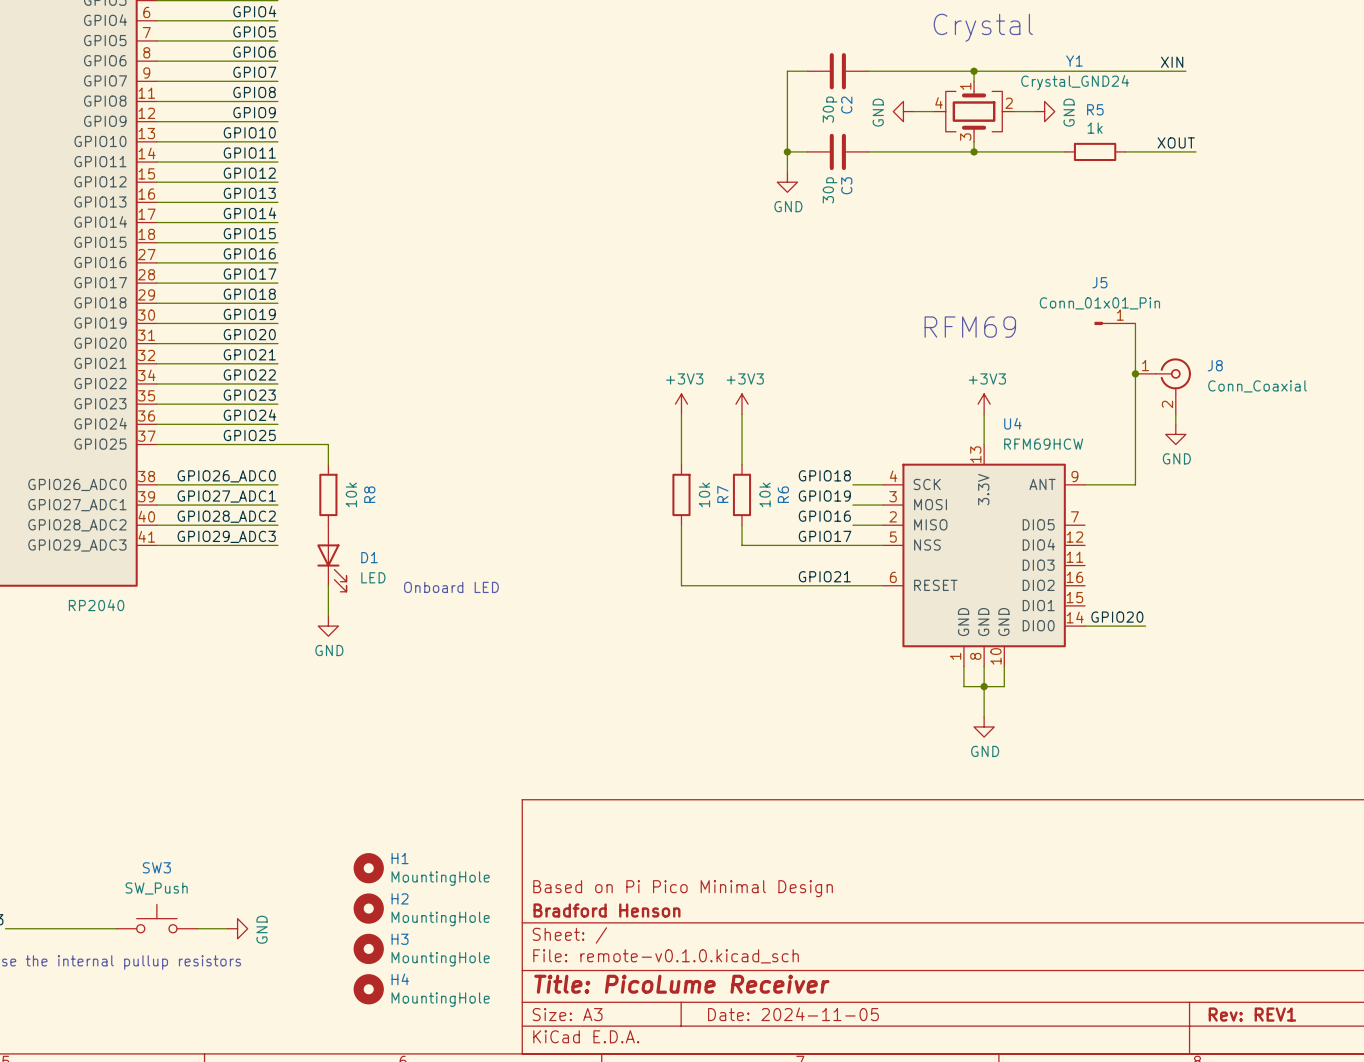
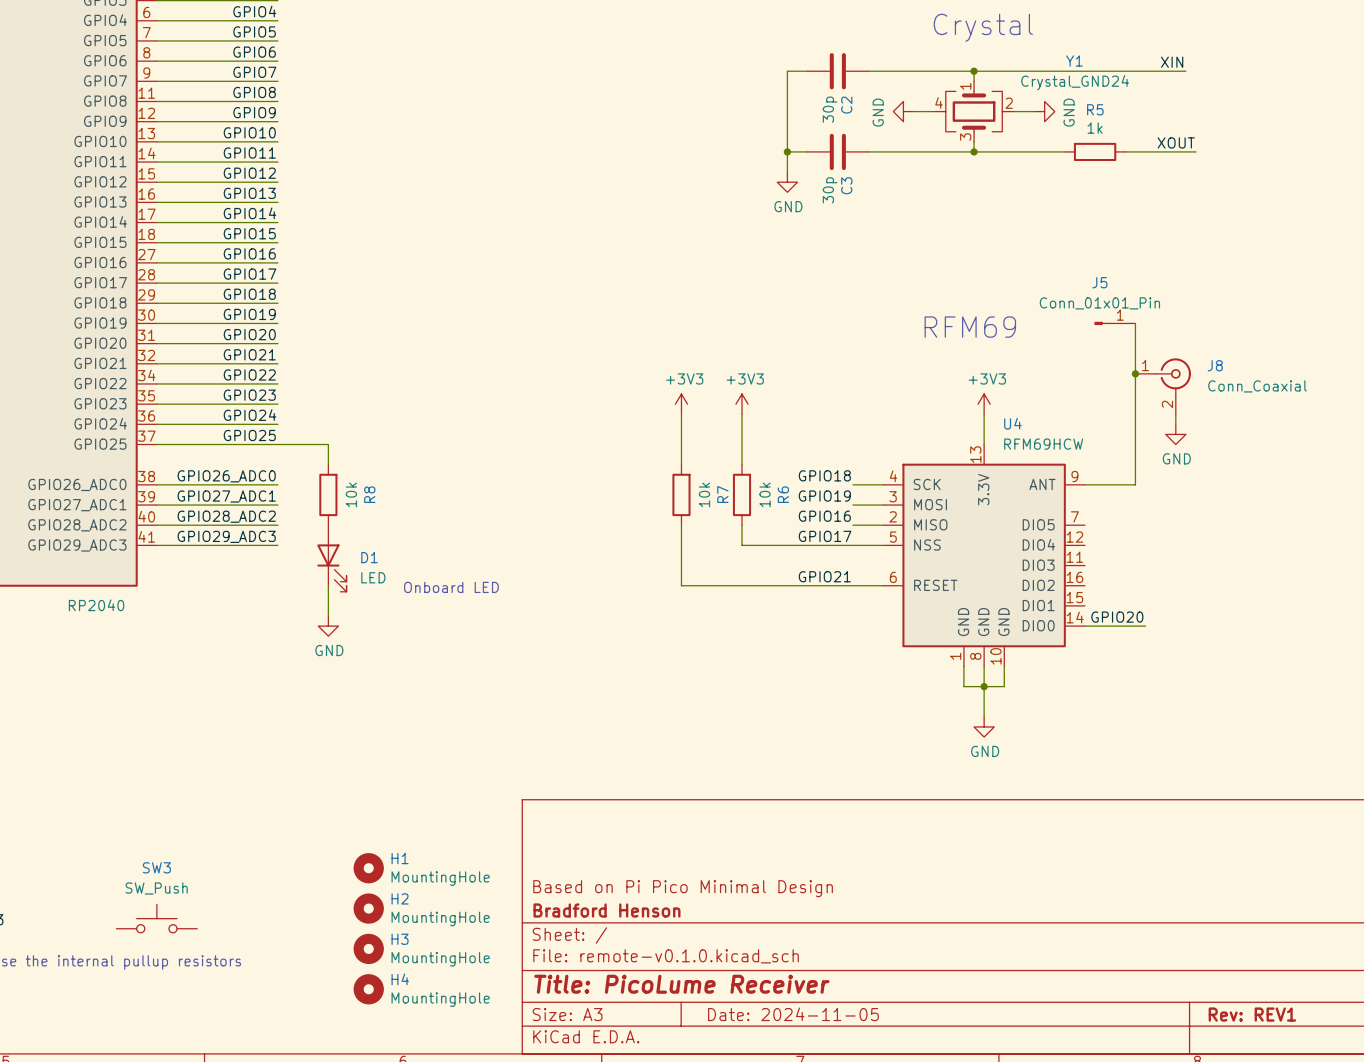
wire: (5, 928) (116, 928) -> none
wire: (197, 928) (227, 928) -> none
power symbol: GND (237, 928) -> none

